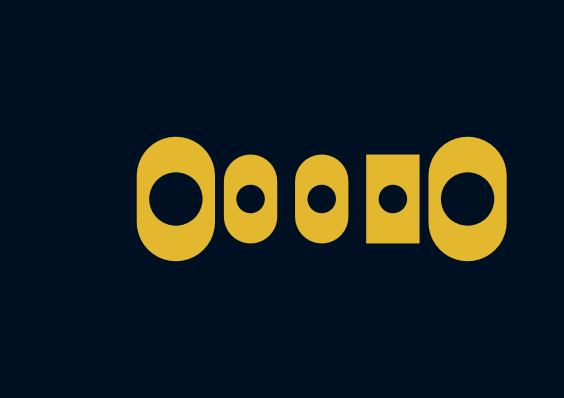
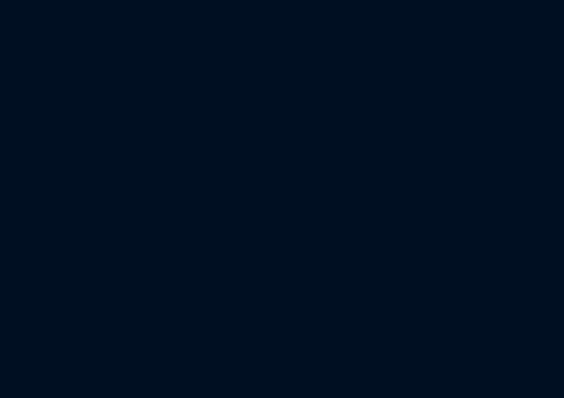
part: (321, 198) -> none

